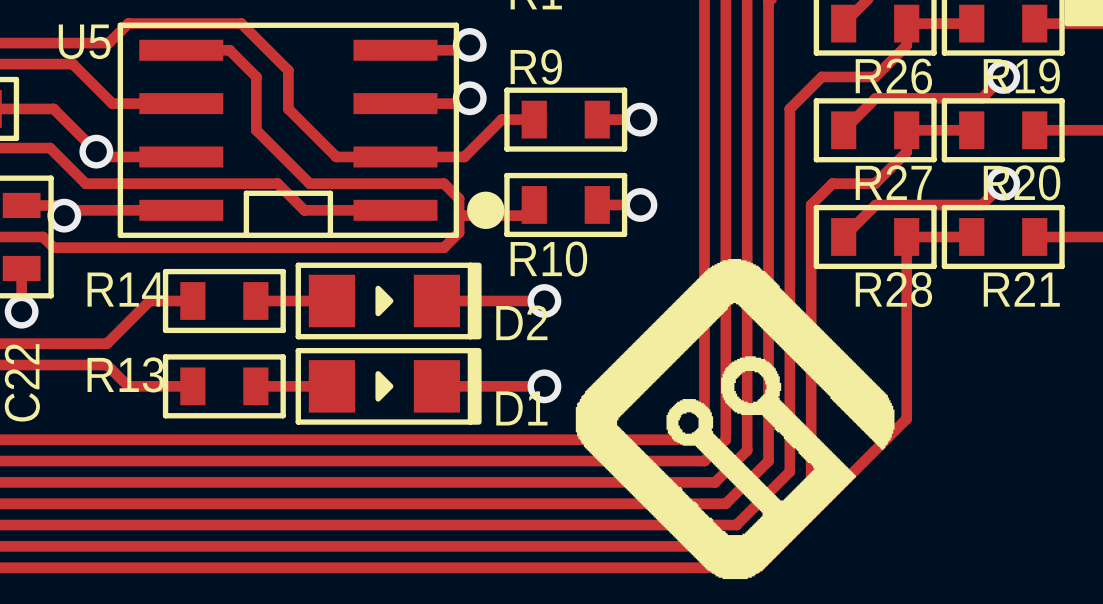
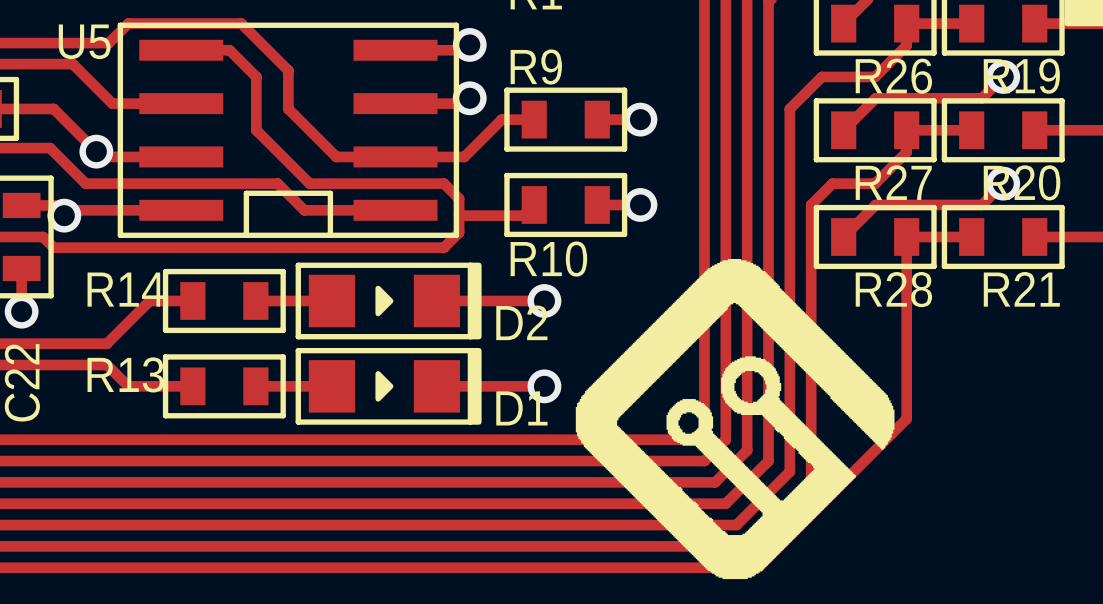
U5 footprint: [117, 22, 505, 238] -> [117, 22, 460, 238]

